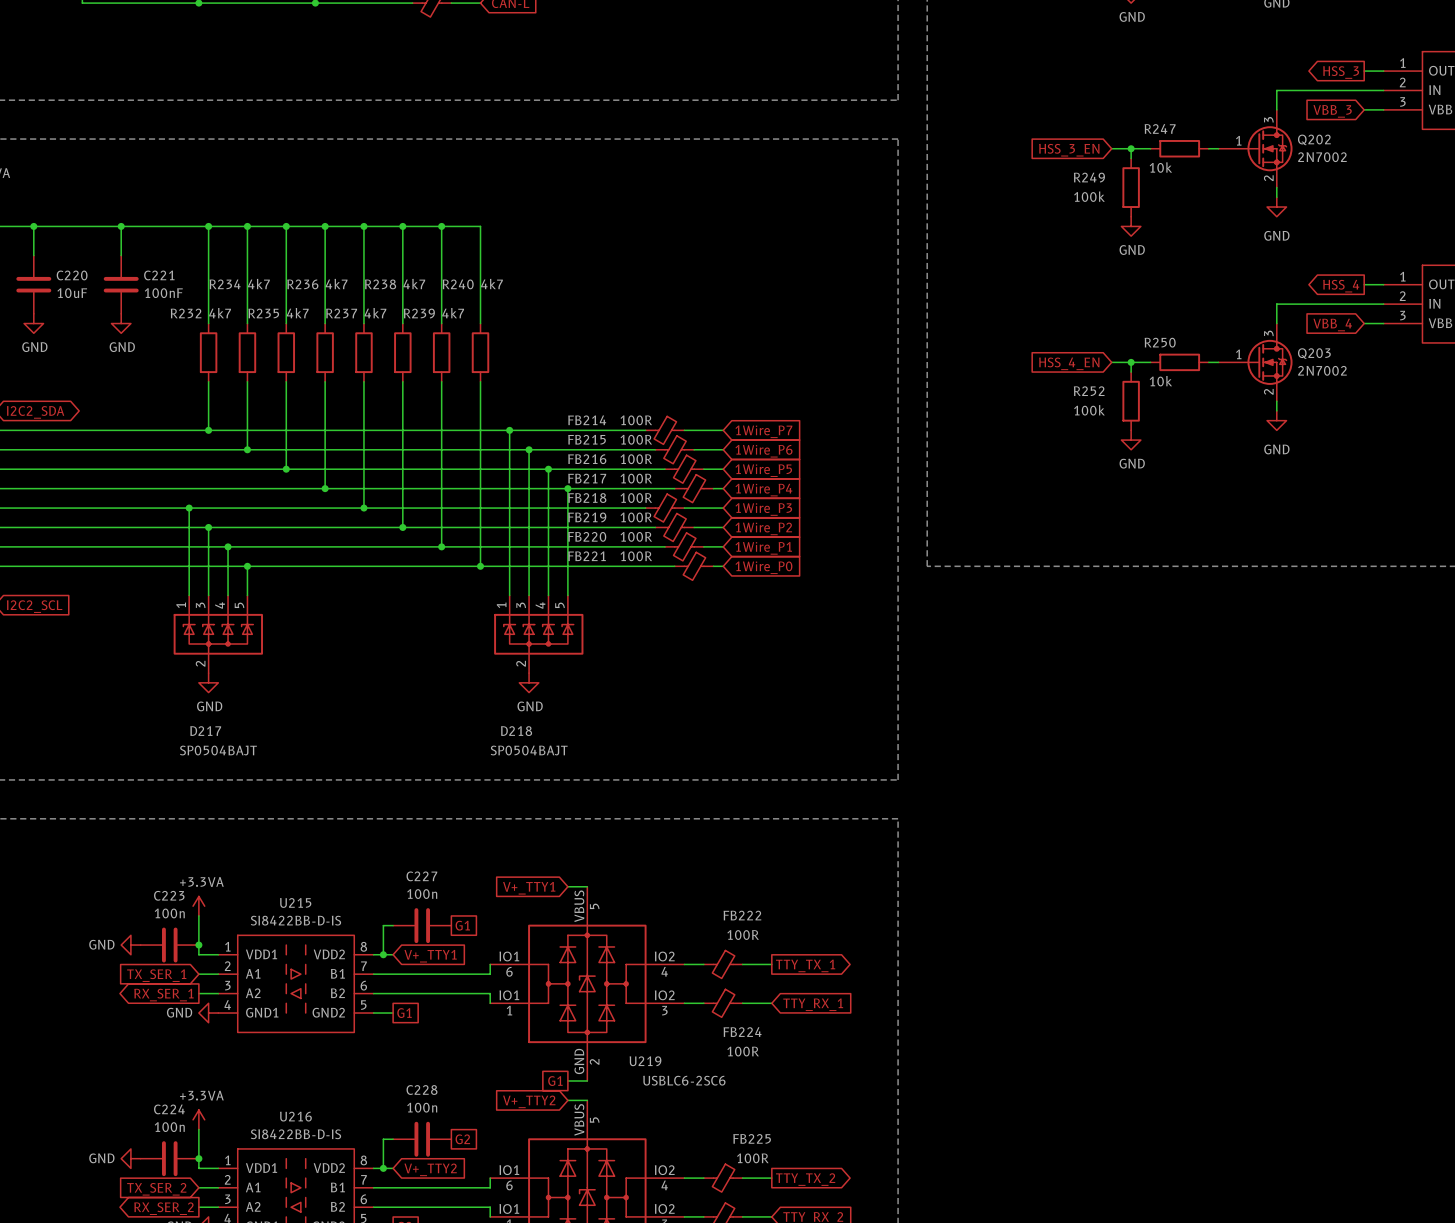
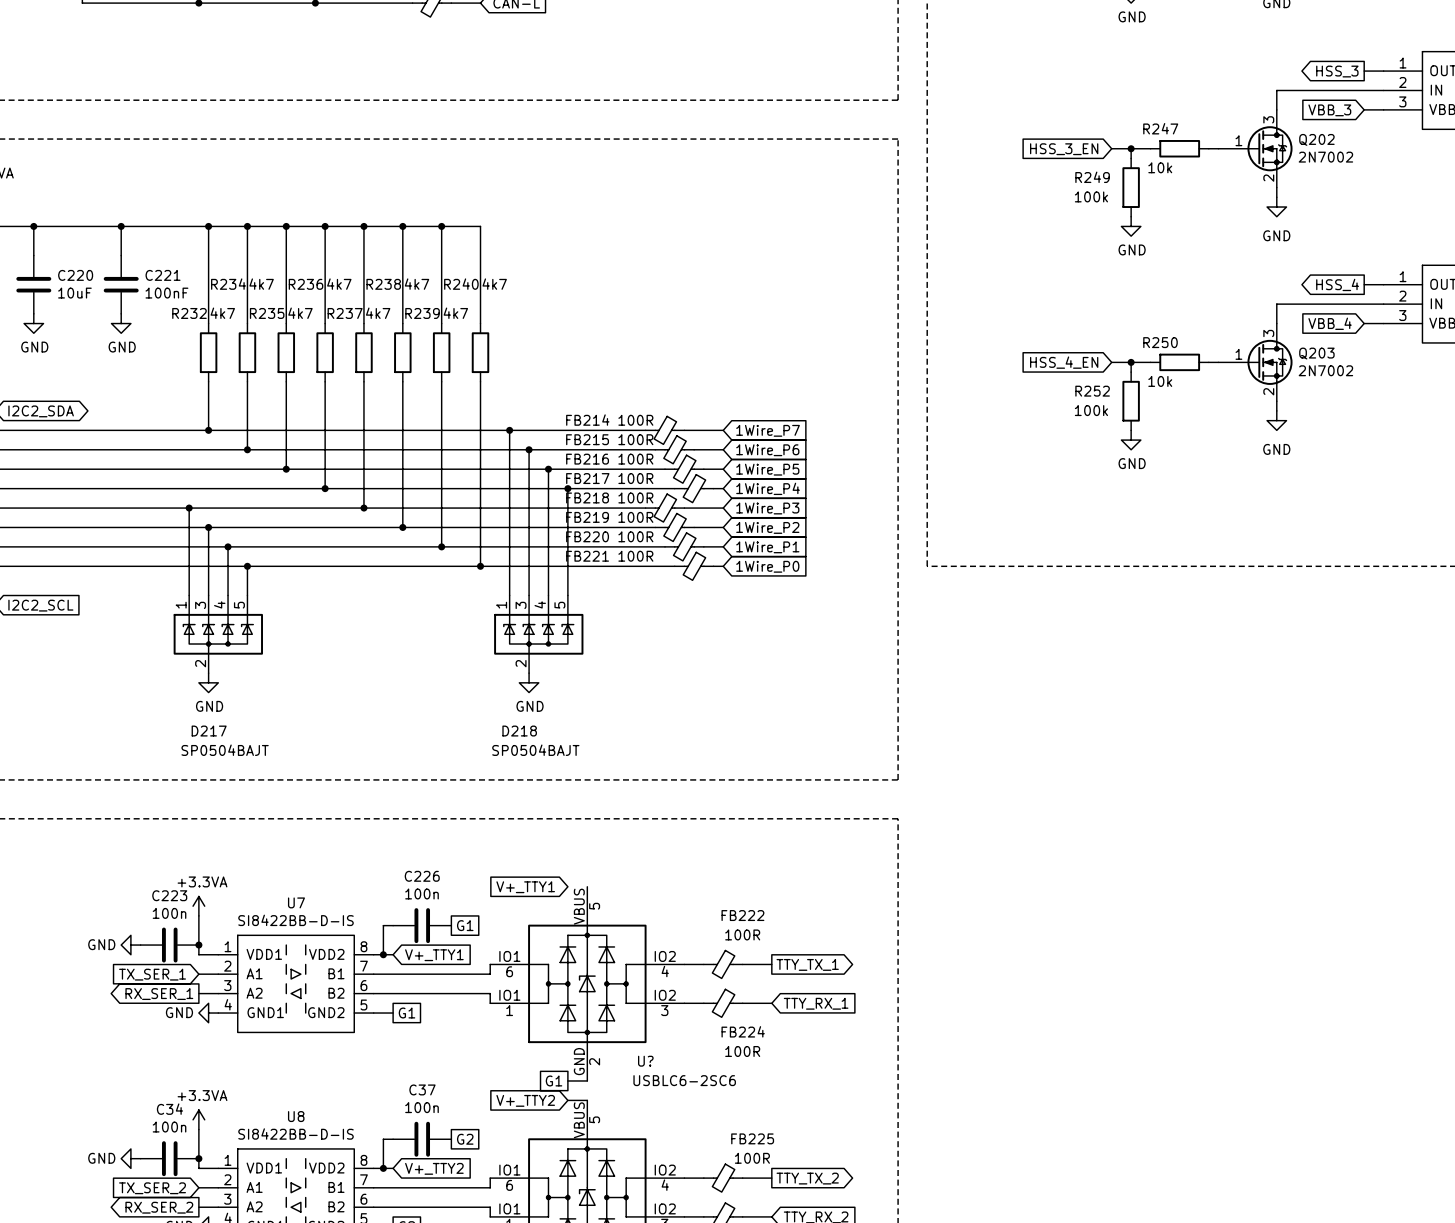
C227 name: C227 (421, 876) -> C226 (422, 876)
wire: (567, 886) (587, 886) -> none
U215 name: U215 (295, 902) -> U7 (296, 902)
U219 name: U219 (645, 1061) -> U? (645, 1061)
C228 name: C228 (421, 1090) -> C37 (422, 1089)
C224 name: C224 (169, 1109) -> C34 (169, 1109)
U216 name: U216 (295, 1116) -> U8 (296, 1116)

